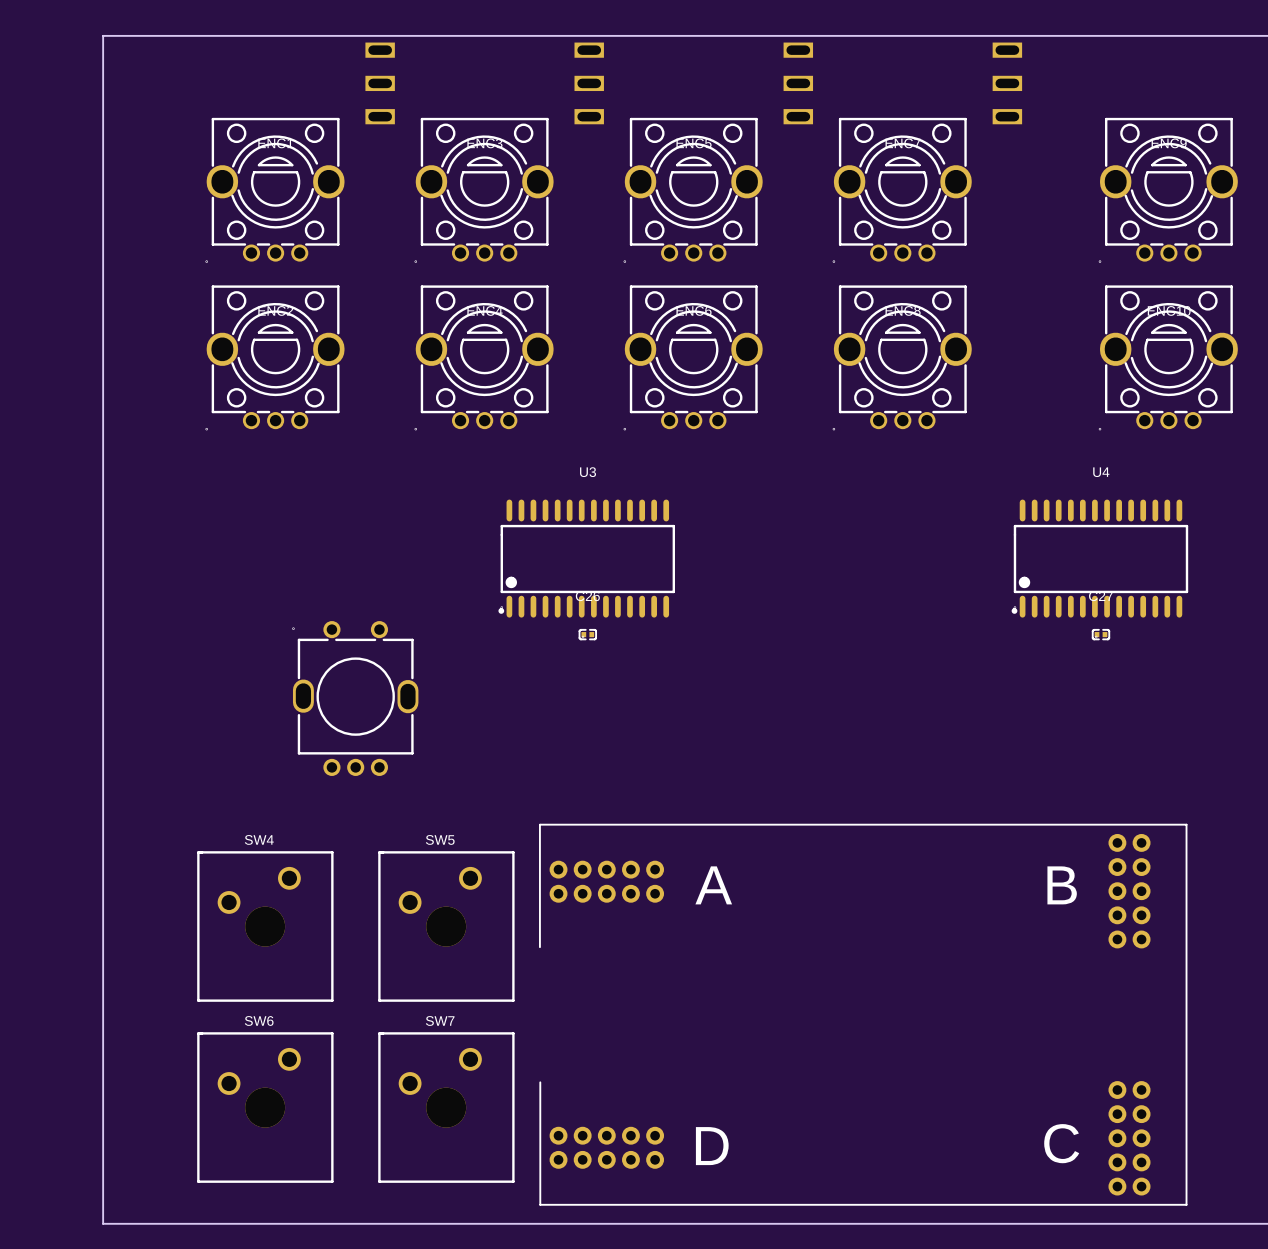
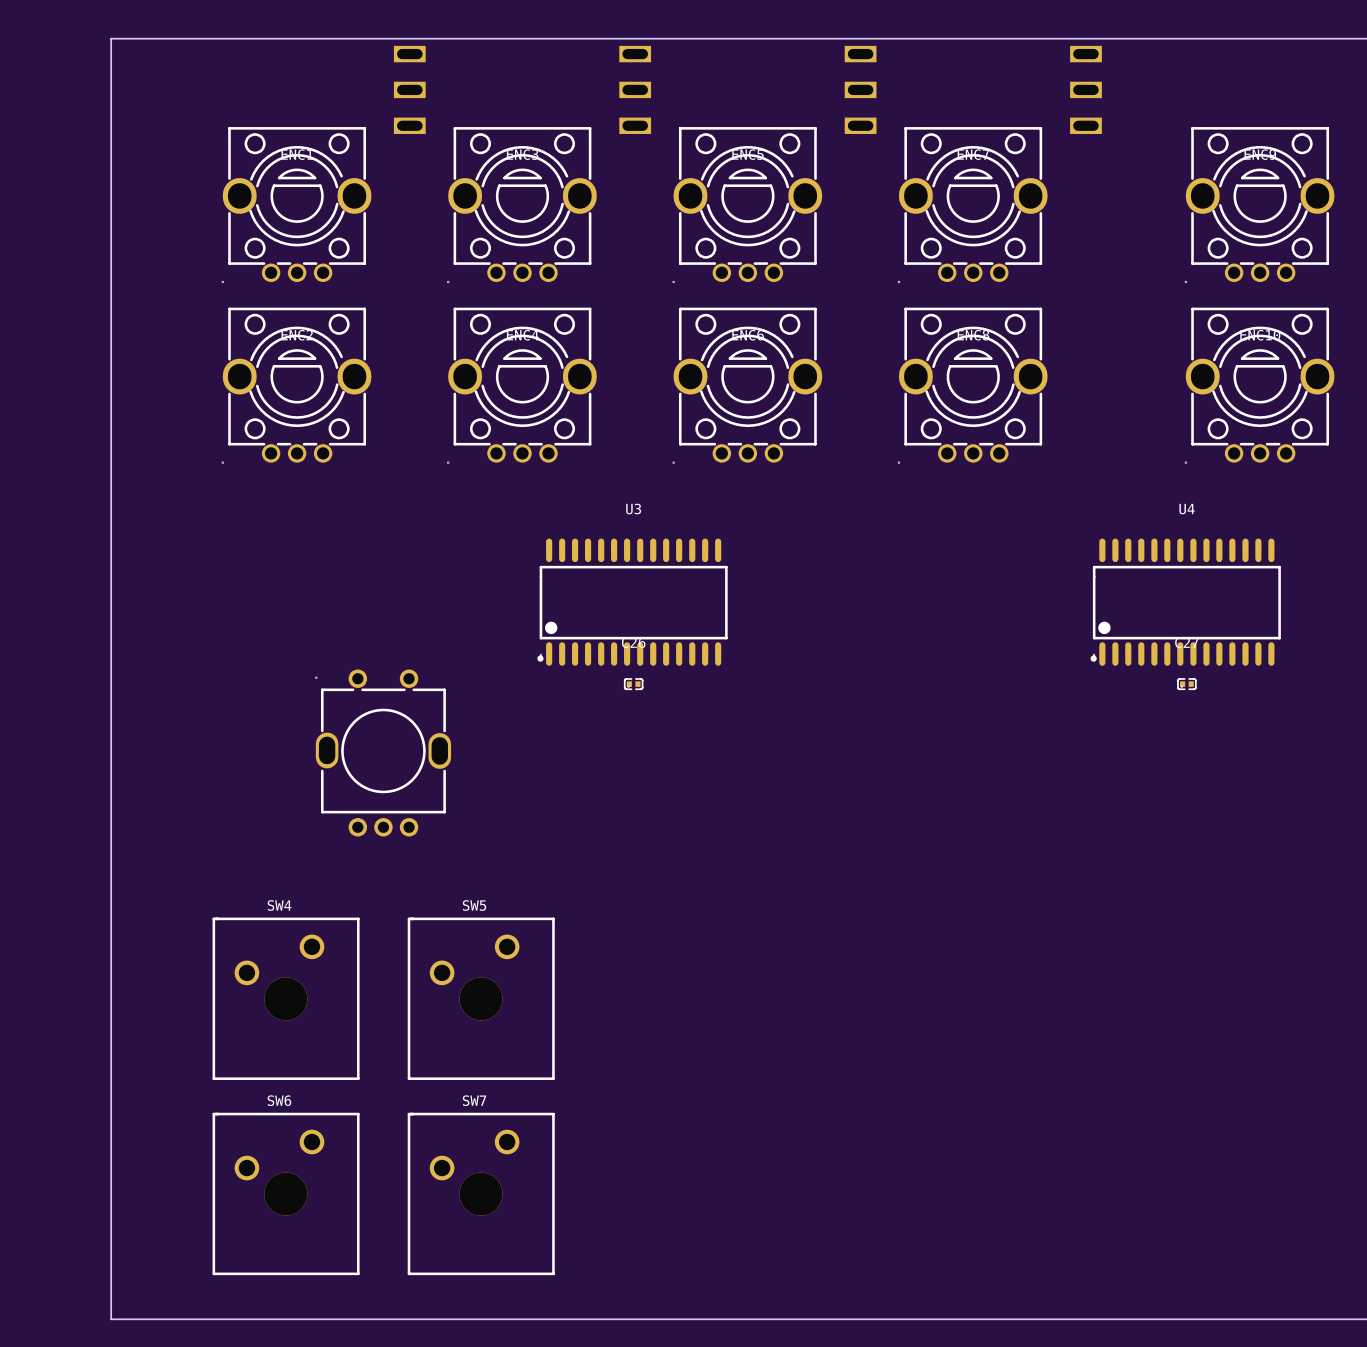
part: (863, 1014) -> none

